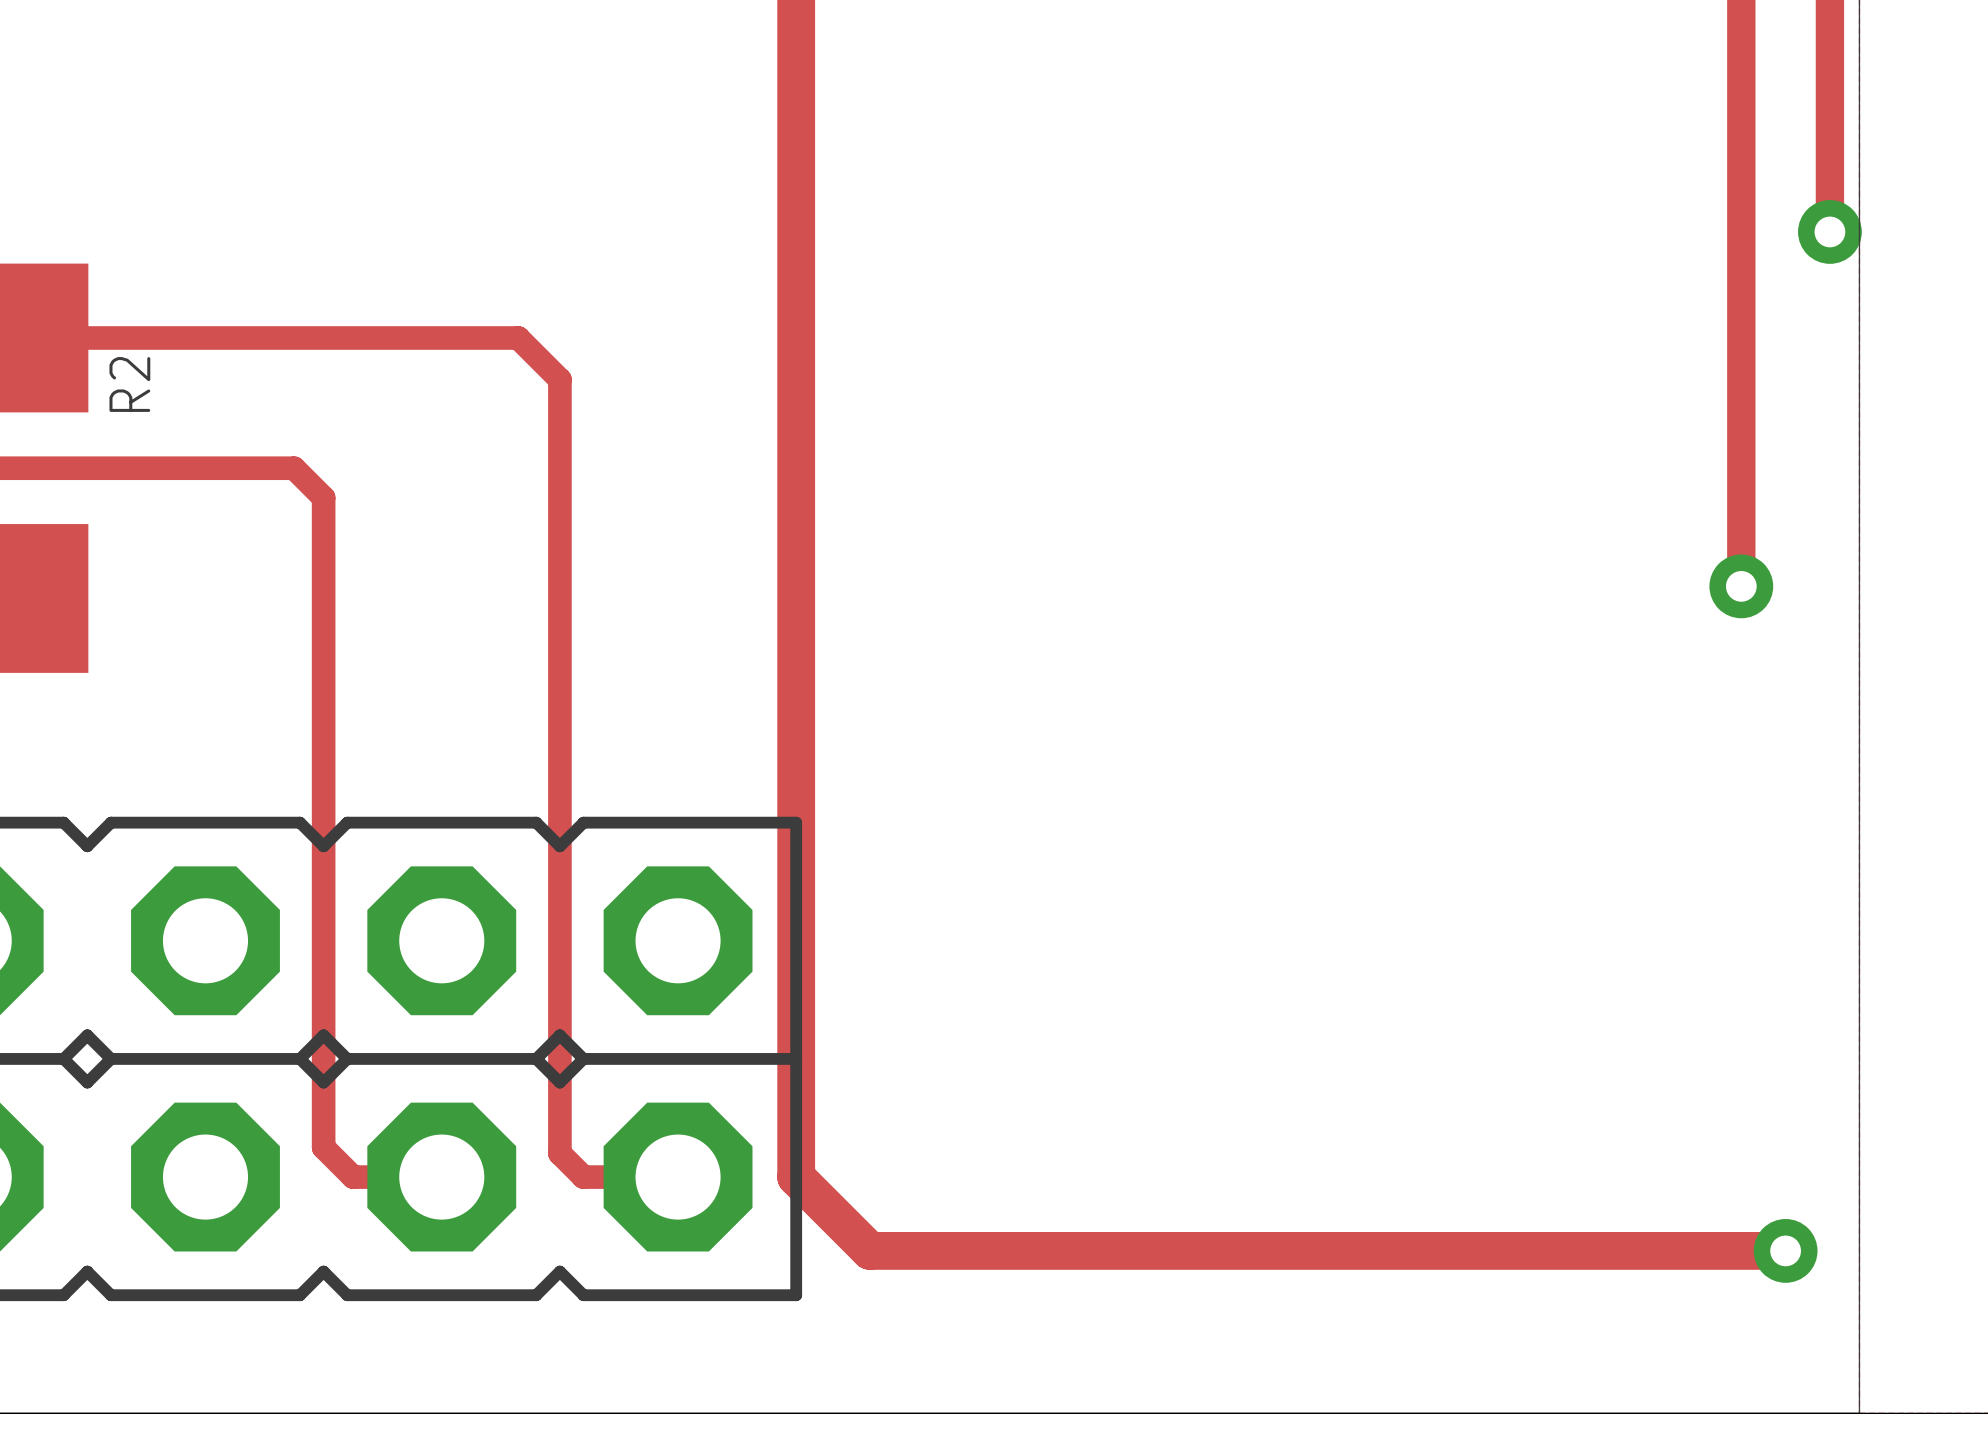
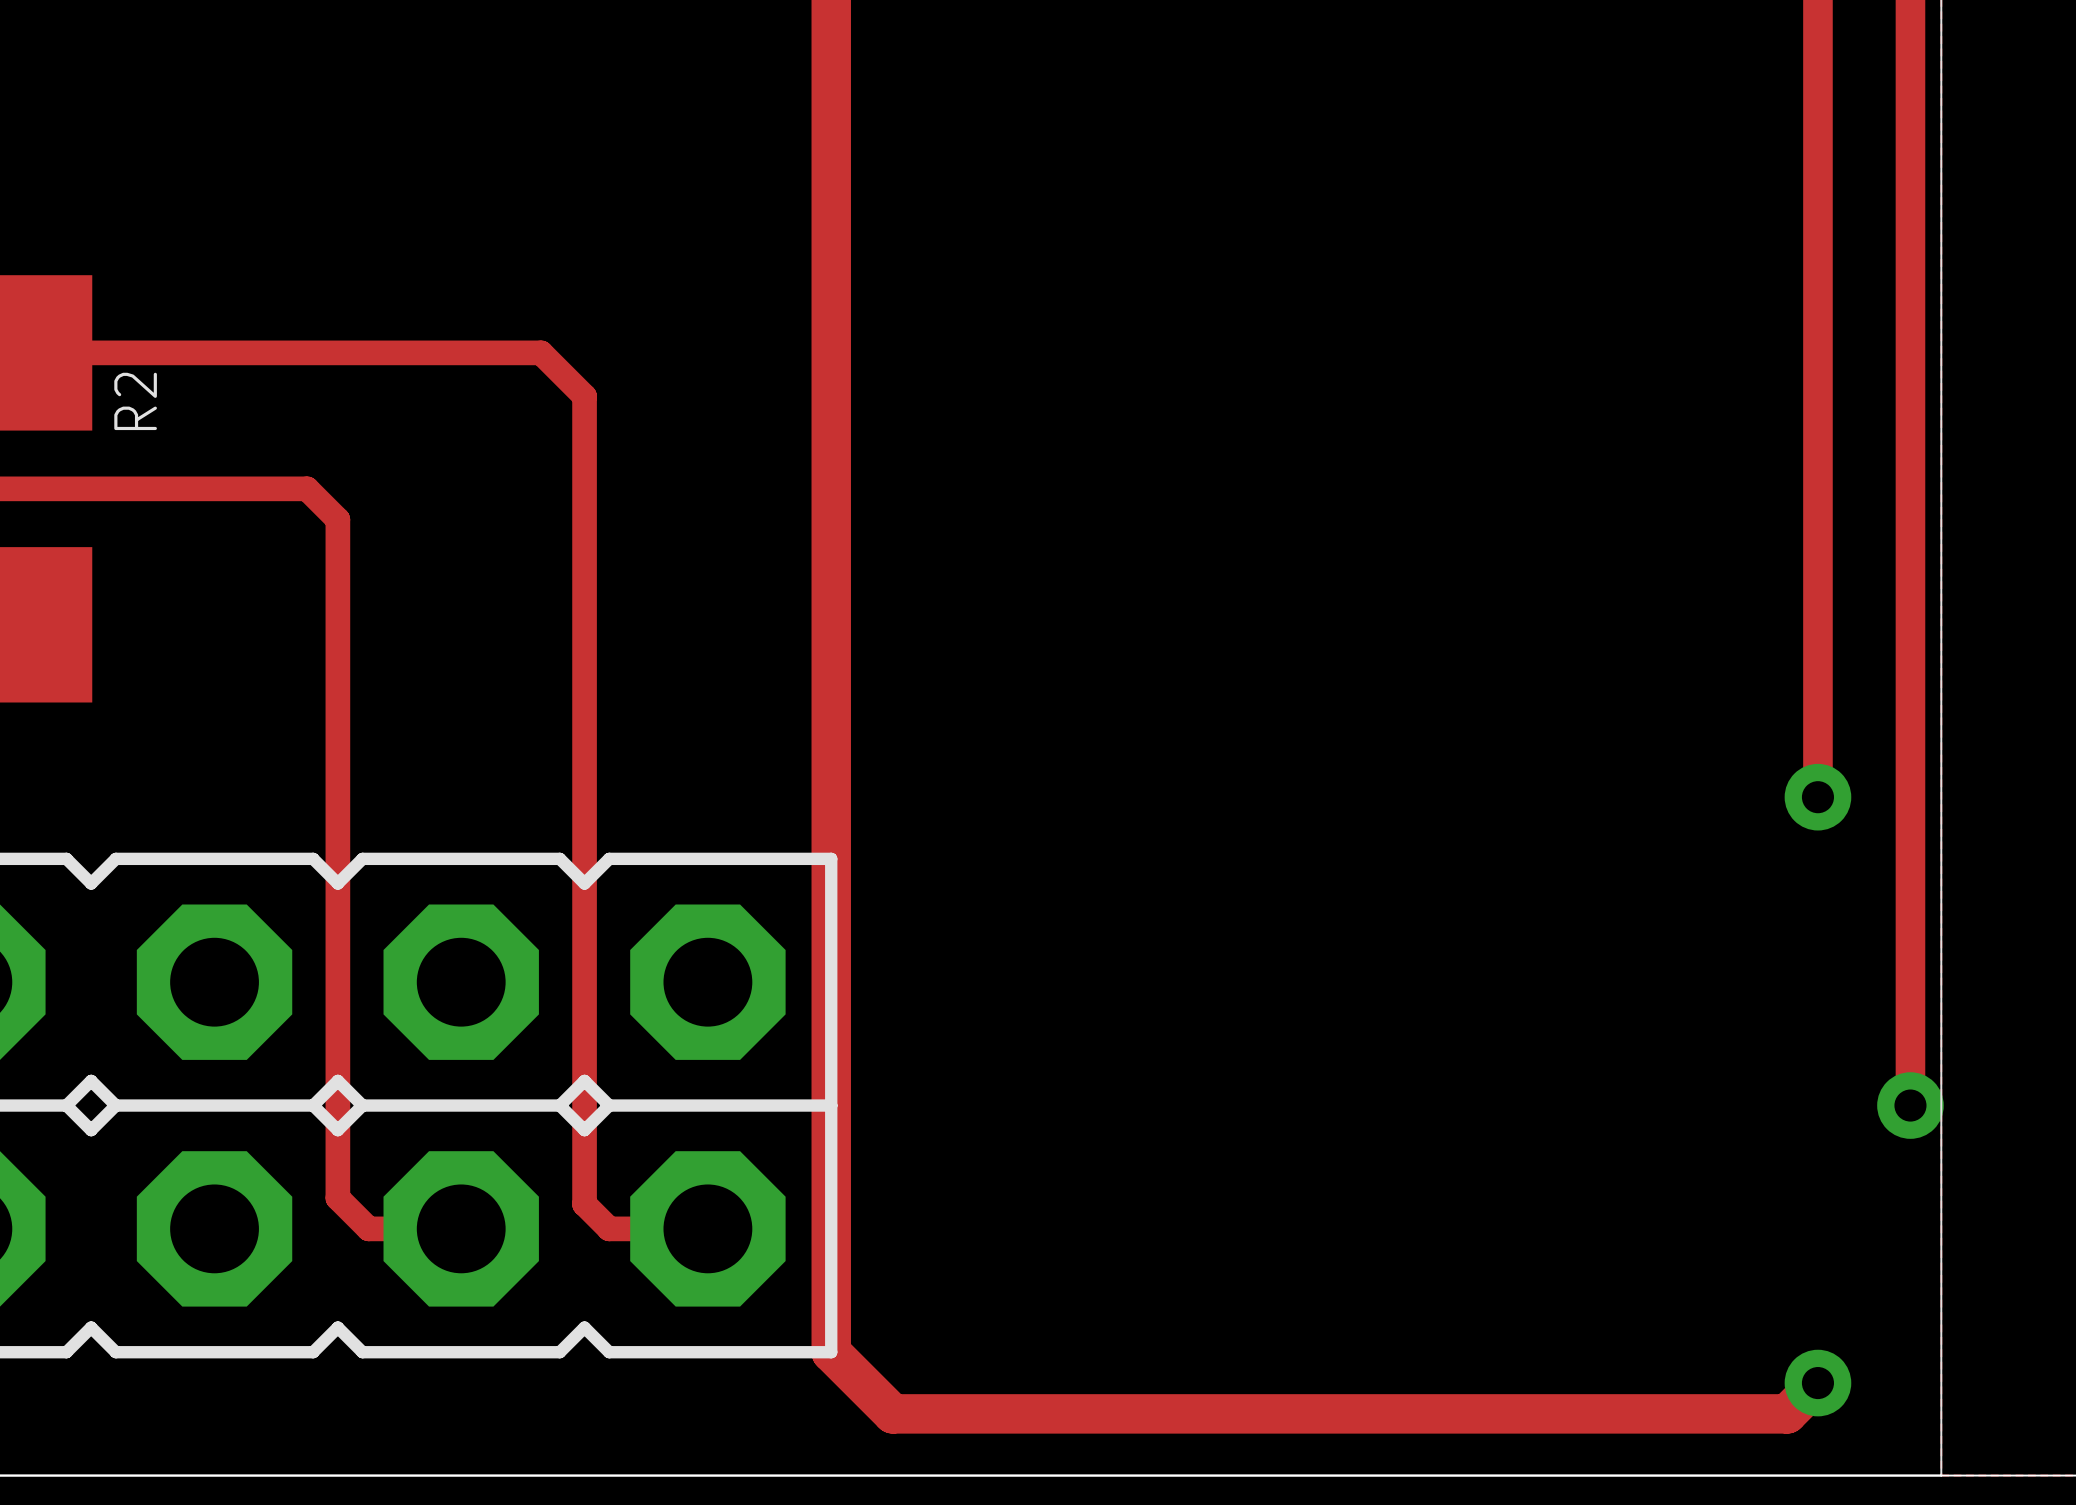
track: none -> (1910, 242) (1910, 1105)
via: (1829, 231) -> none
track: none -> (1817, 612) (1817, 797)
via position: (1741, 586) -> (1817, 797)
via: none -> (1910, 1105)
track: (796, 1177) (870, 1250) (1785, 1250) -> (831, 1228) (831, 1352) (892, 1413) (1787, 1413) (1817, 1383)
via position: (1785, 1250) -> (1817, 1383)

